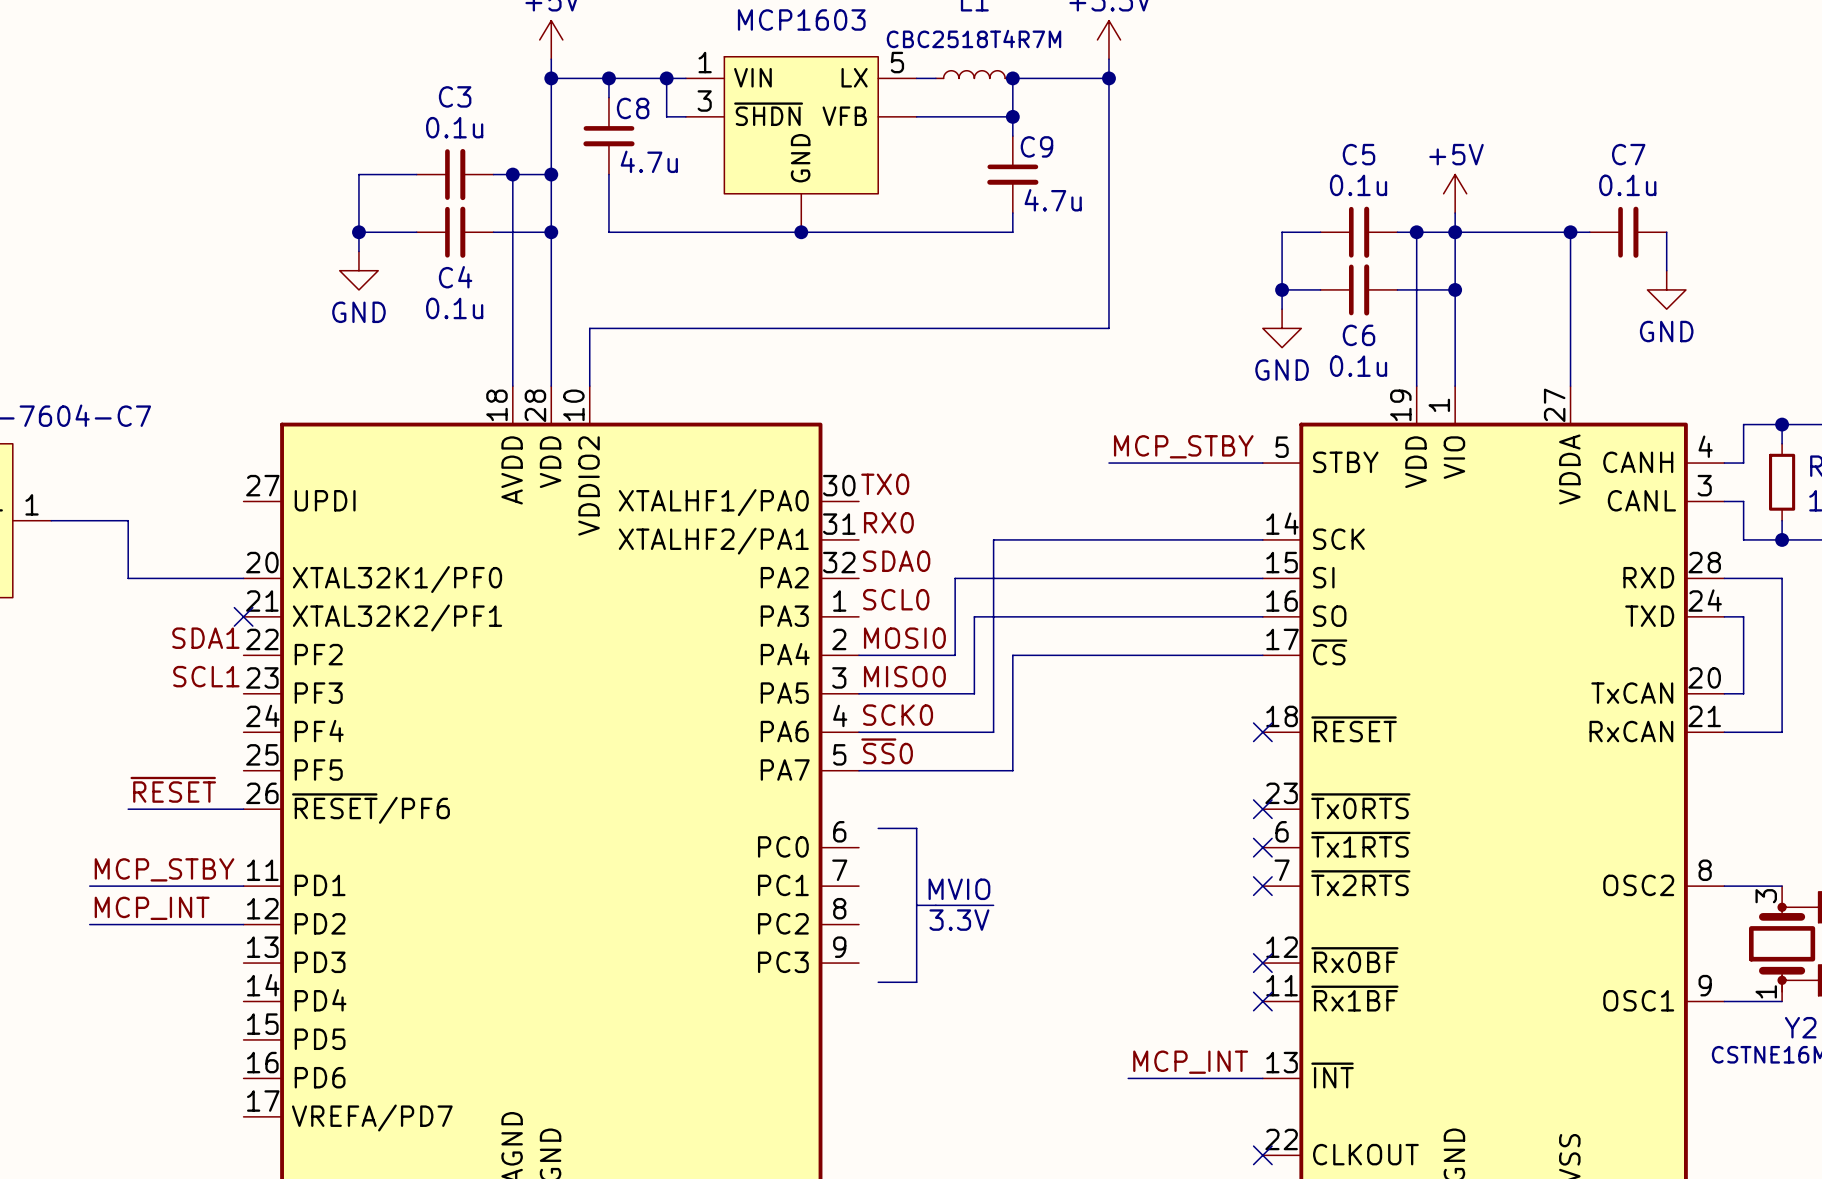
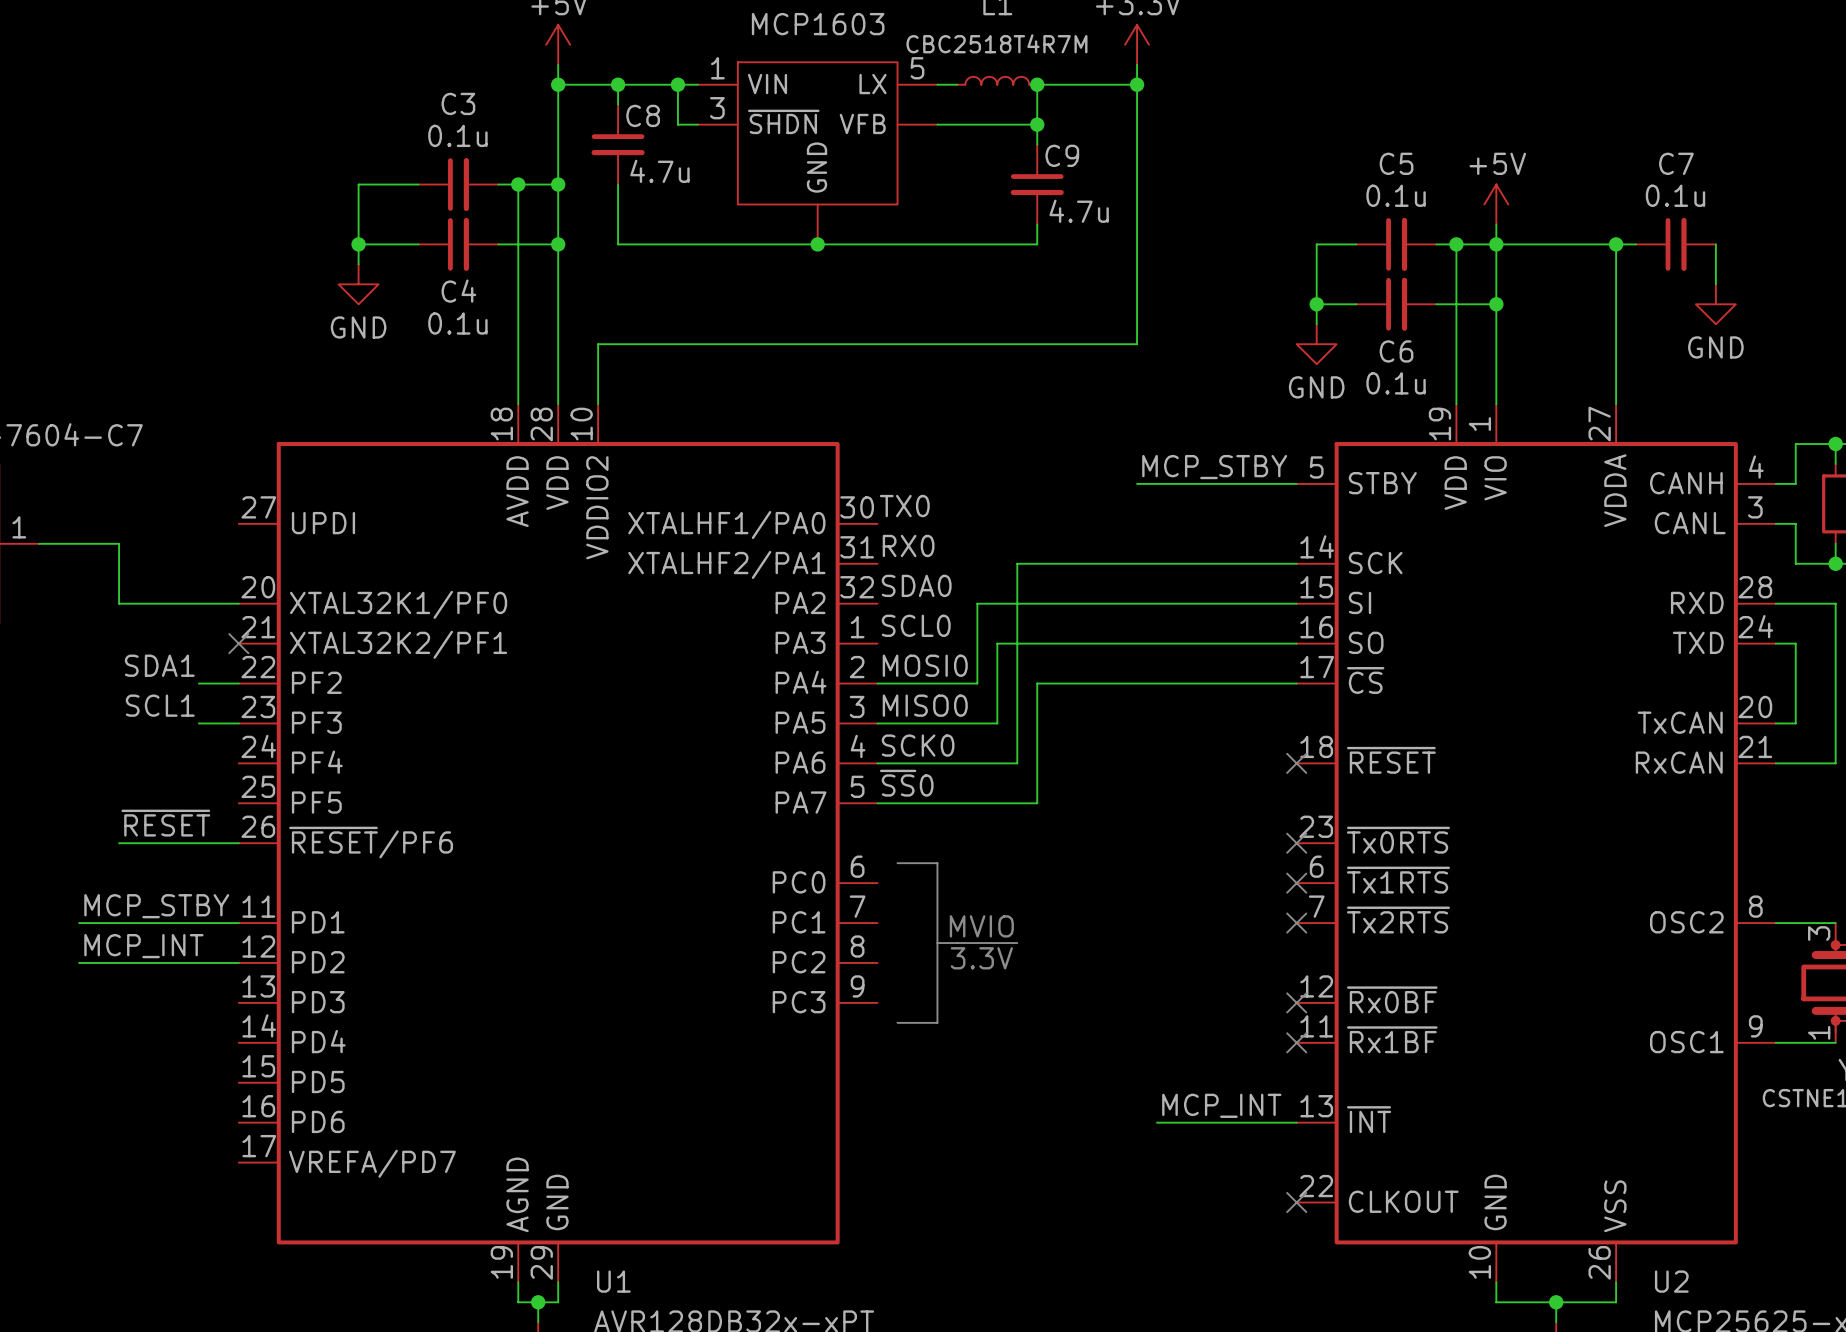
label position: SDA1 (205, 638) -> SDA1 (159, 665)
wire: none -> (198, 683) (238, 683)
label position: SCL1 (206, 676) -> SCL1 (160, 705)
wire: none -> (198, 723) (238, 723)

